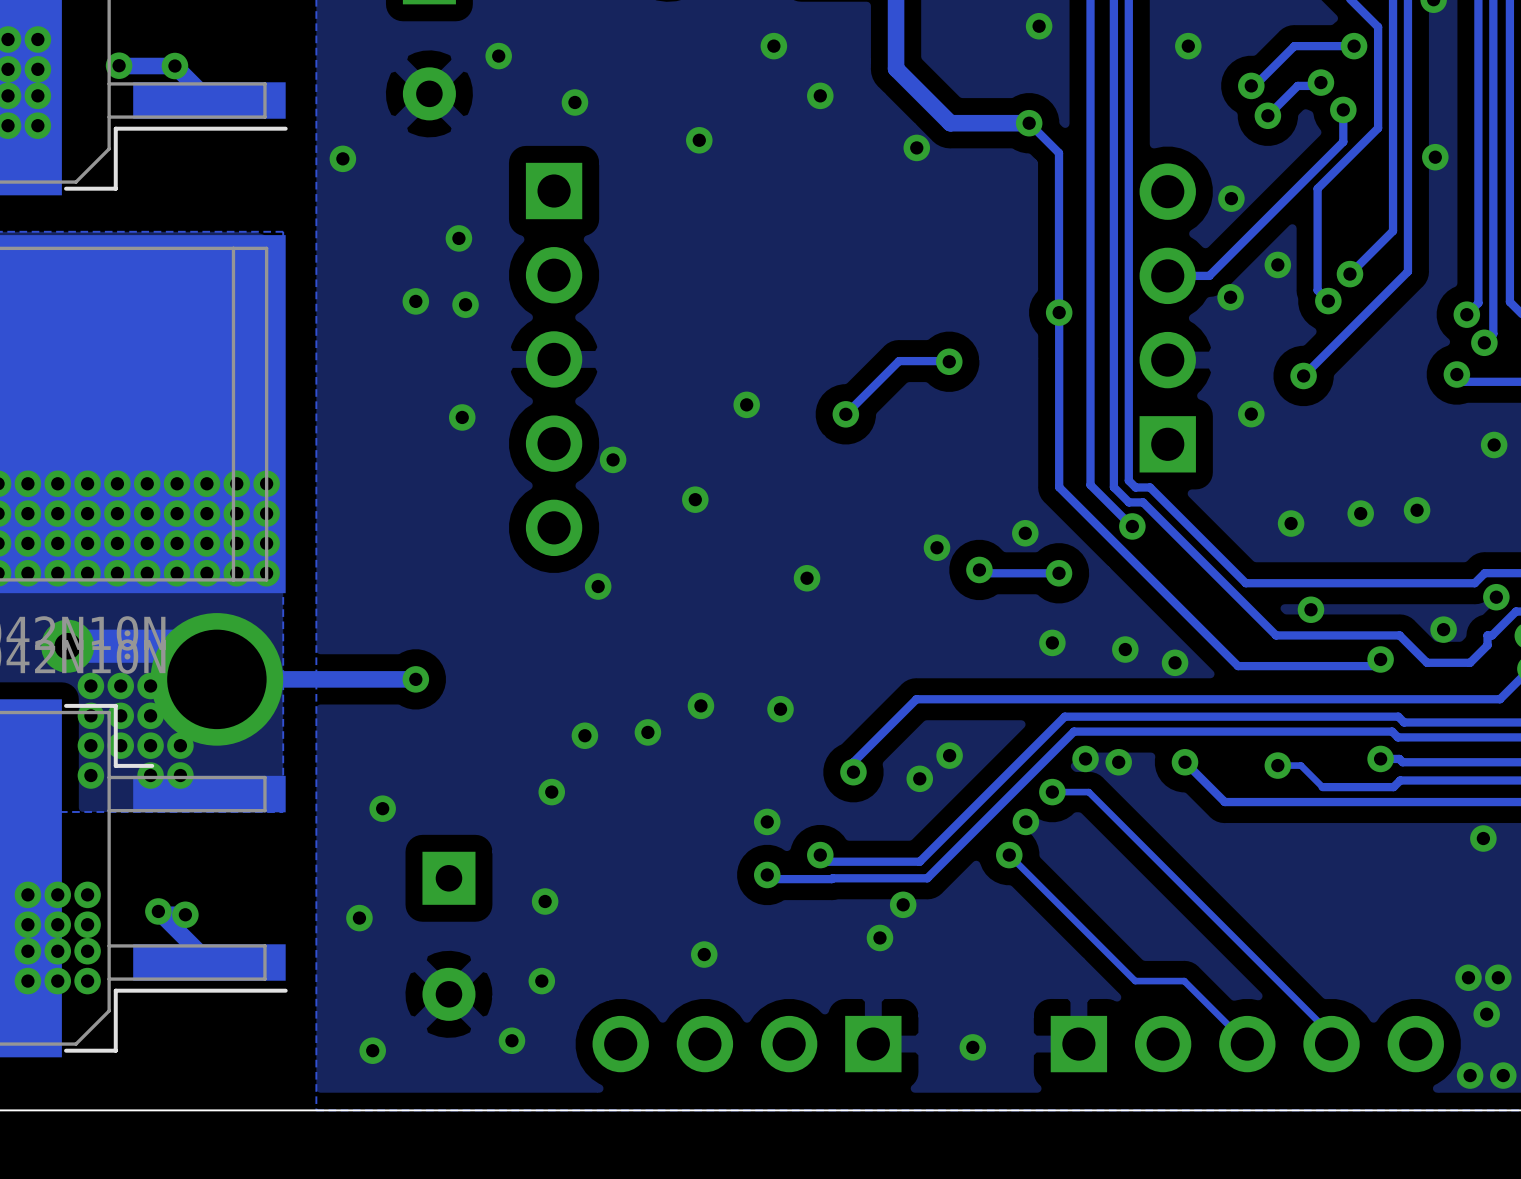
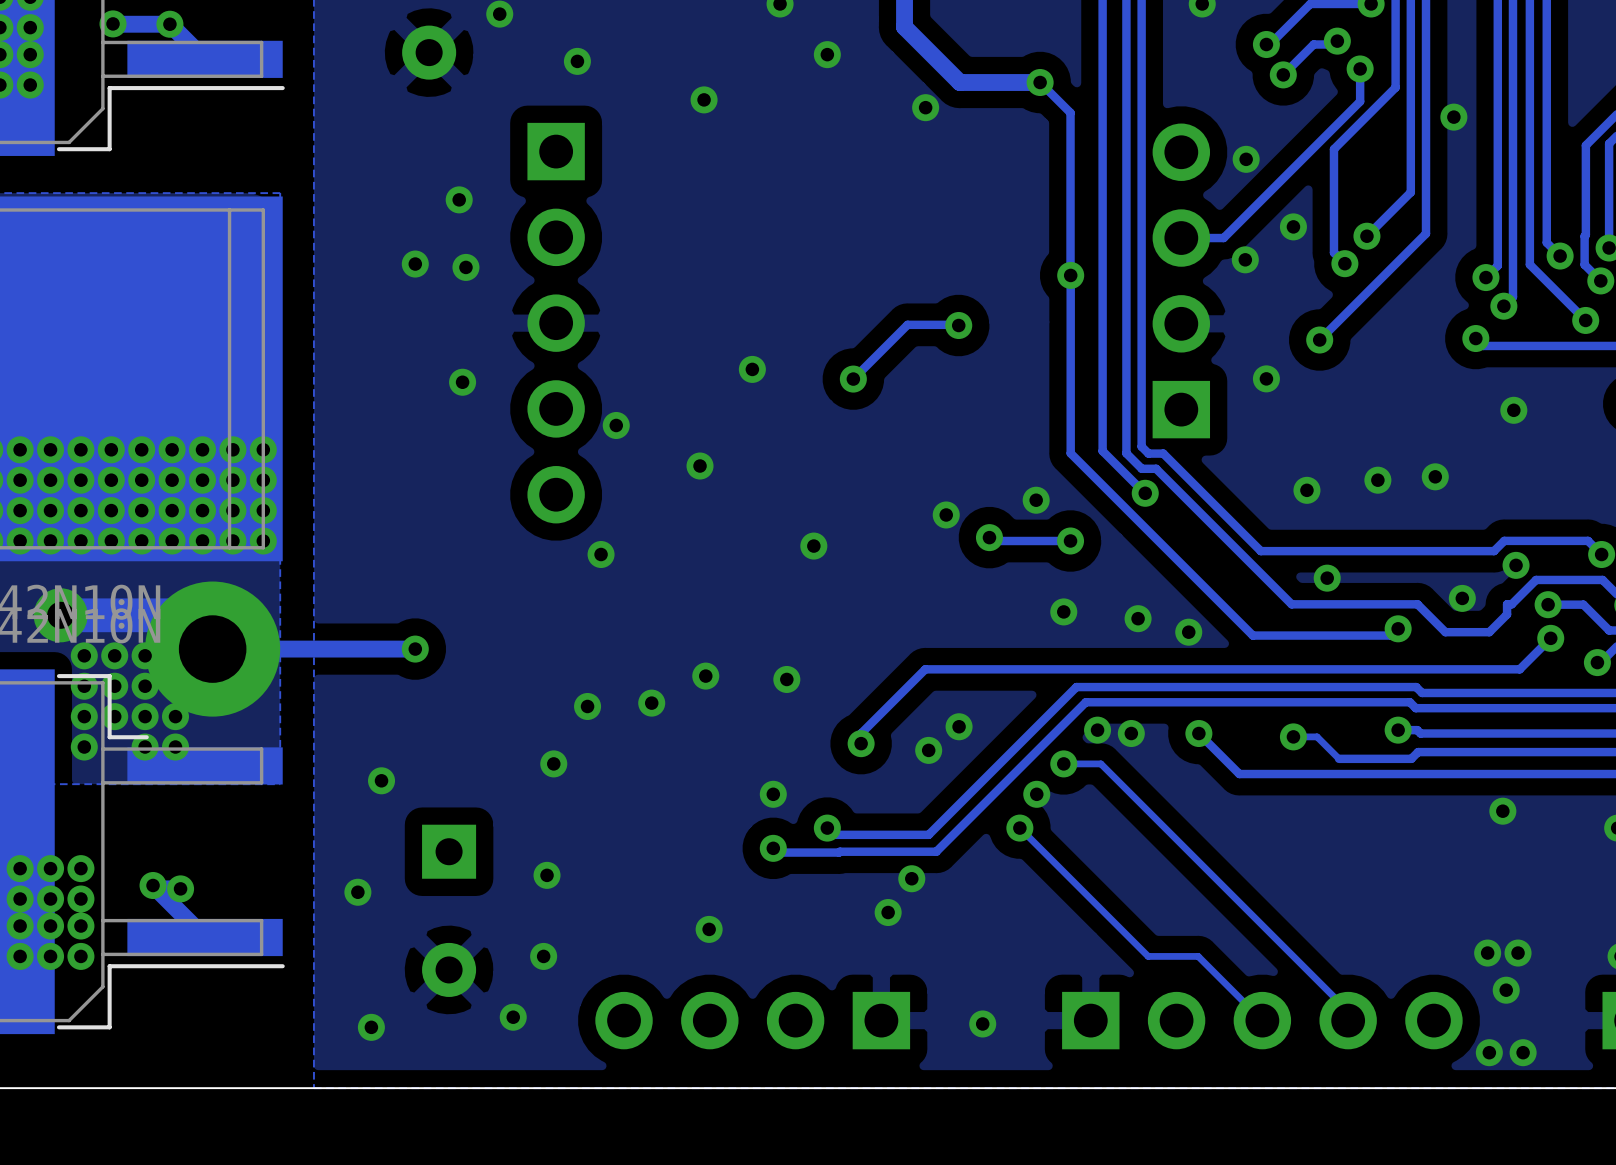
via: (342, 158) -> none
part footprint: [150, 613, 284, 746] -> [145, 581, 281, 717]

